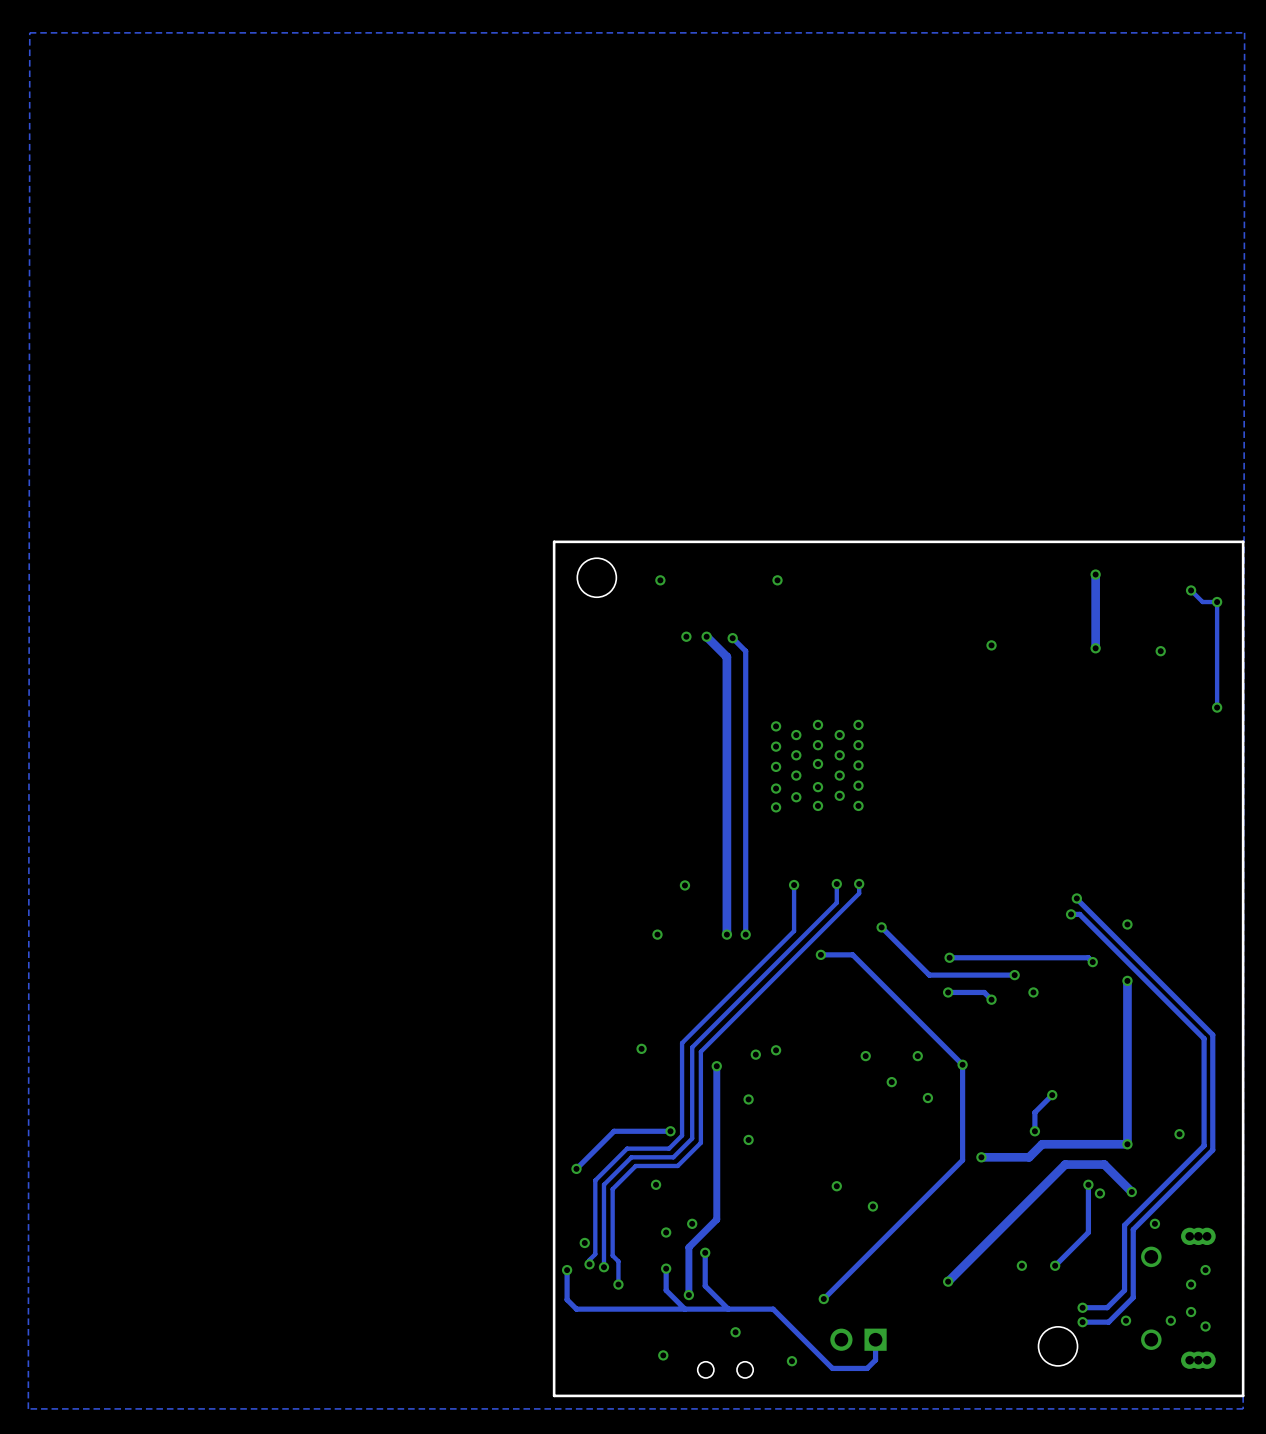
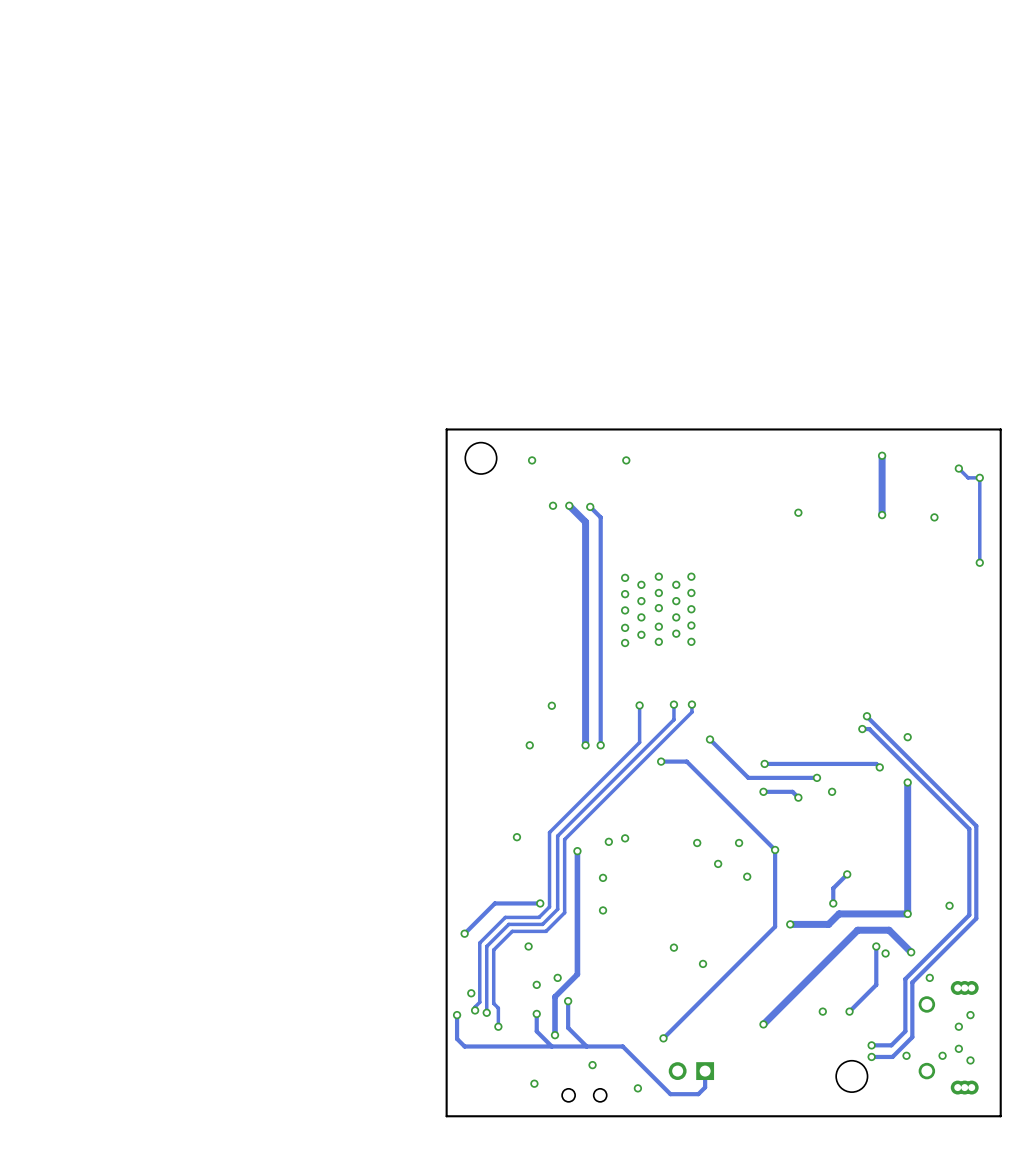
zone outline: (1244, 32) (29, 32) (28, 1408) (1243, 1408) (1244, 32) -> none

